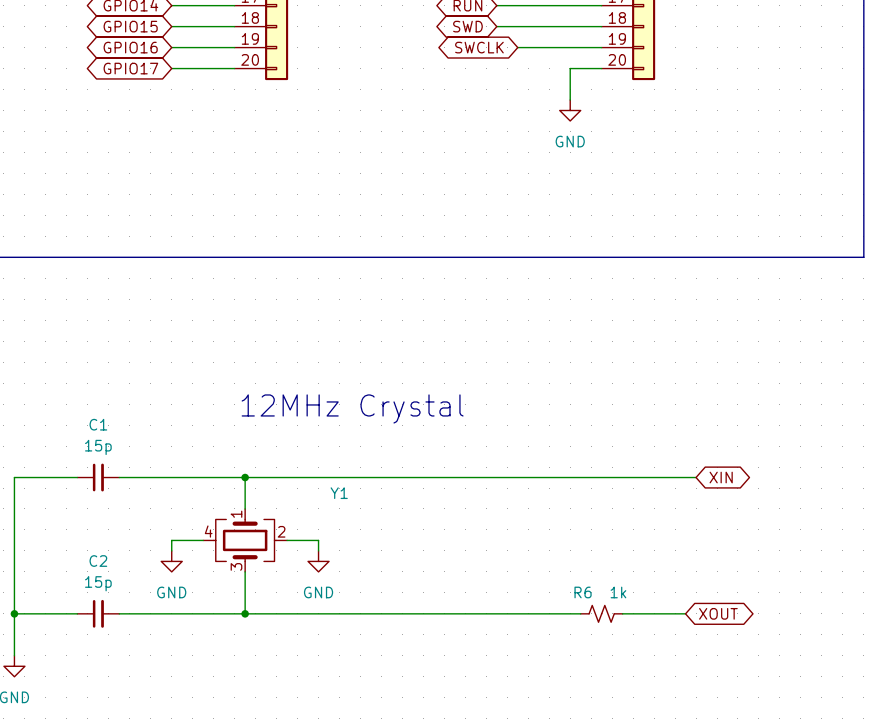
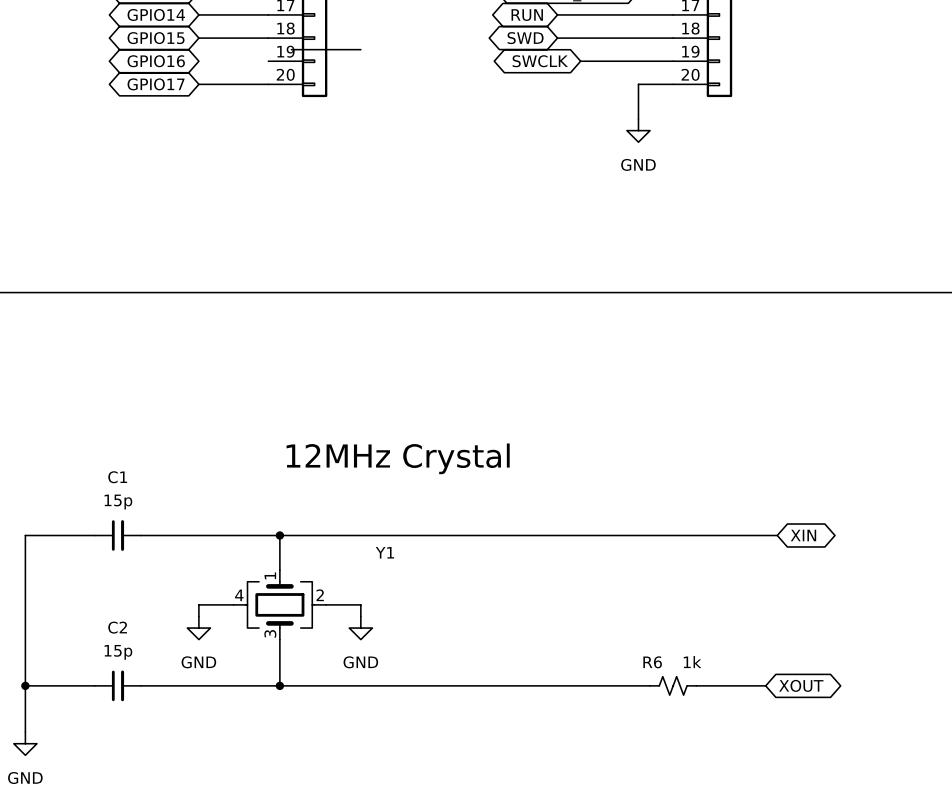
wire: (171, 47) (234, 47) -> (291, 49) (360, 49)

